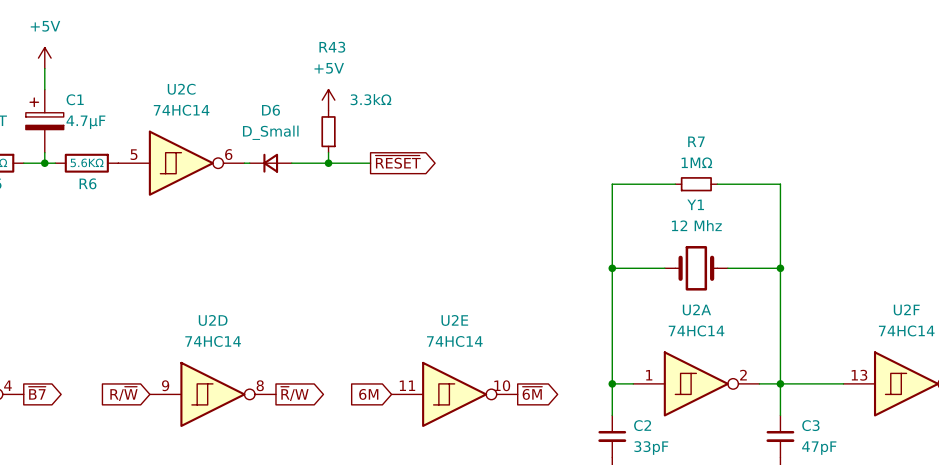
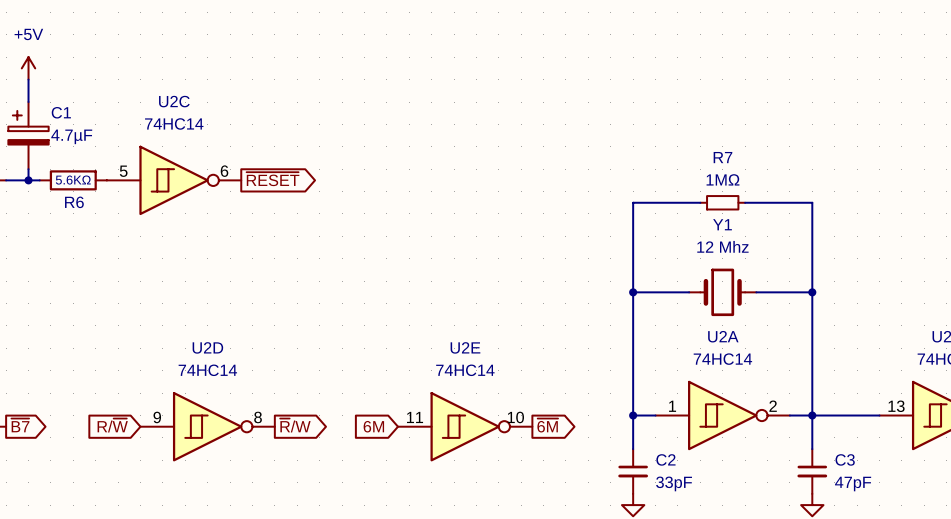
power symbol: +5V (328, 100) -> none
R43: 3.3kΩ (328, 131) -> none
wire: (328, 152) (328, 163) -> none
global label position: ~{RESET} (398, 162) -> ~{RESET} (272, 179)
wire: (244, 163) (249, 163) -> none
D6: D_Small (270, 163) -> none
wire: (291, 163) (370, 163) -> none
junction: (328, 163) -> none

